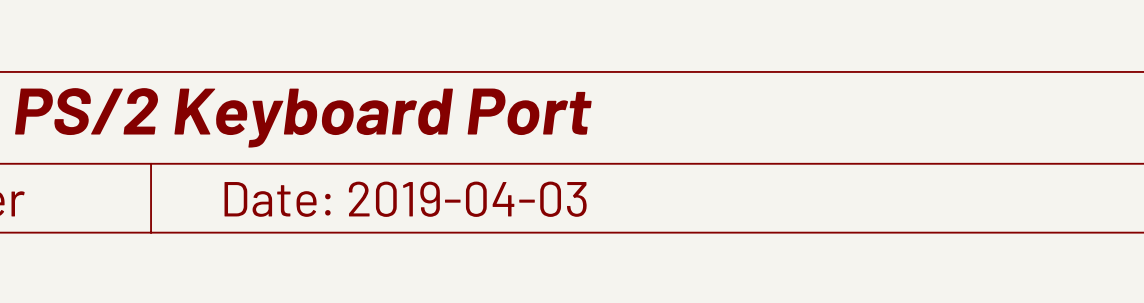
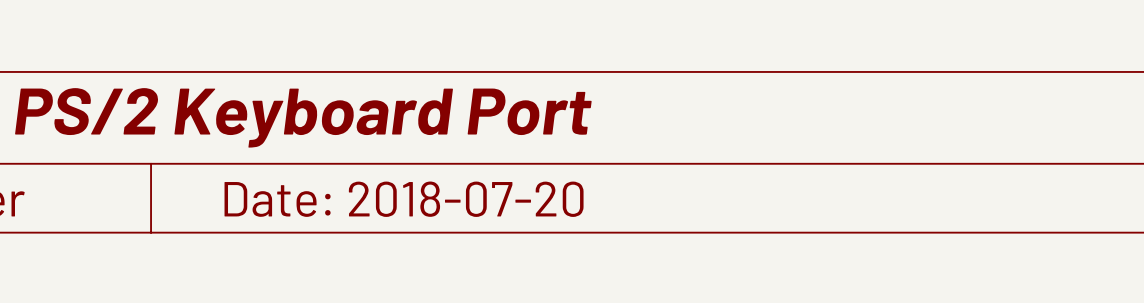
title block: Date: 2019-04-03 (405, 199) -> Date: 2018-07-20 (404, 199)

